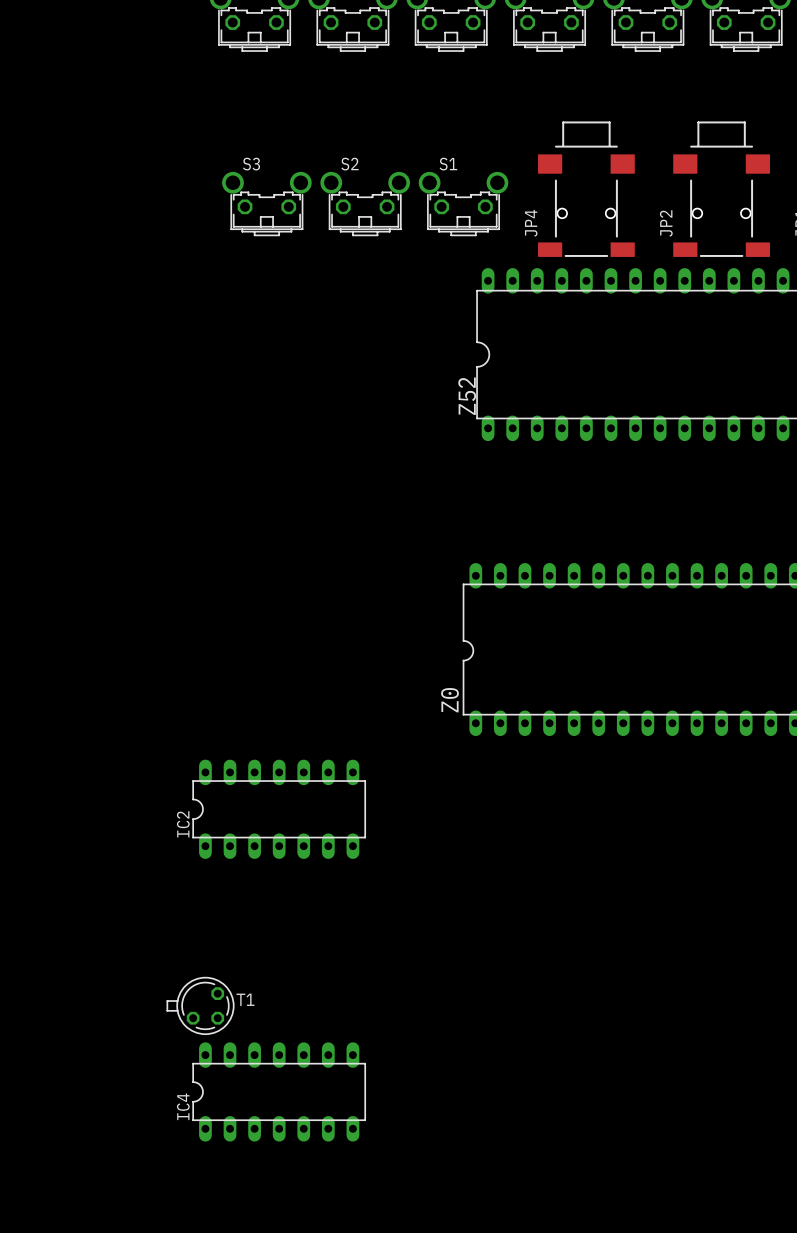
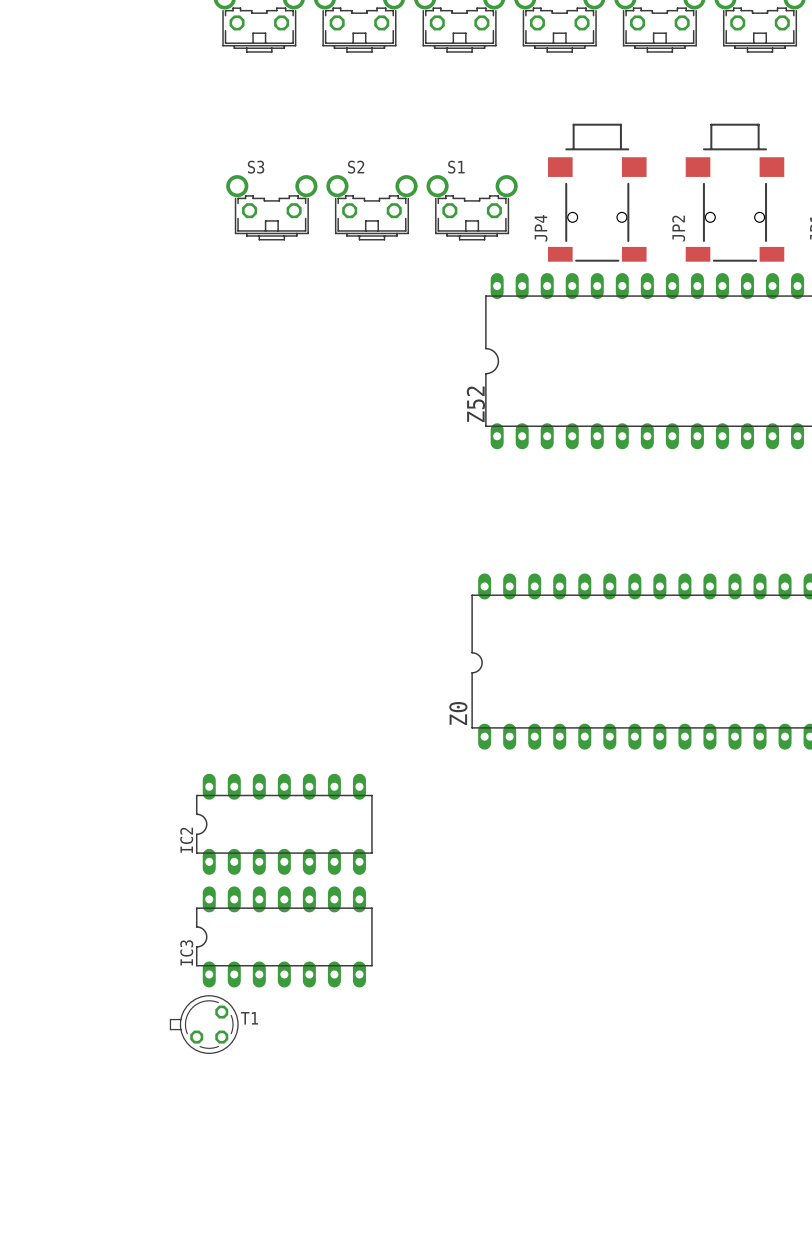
IC3: none -> (284, 936)
IC4: (279, 1091) -> none

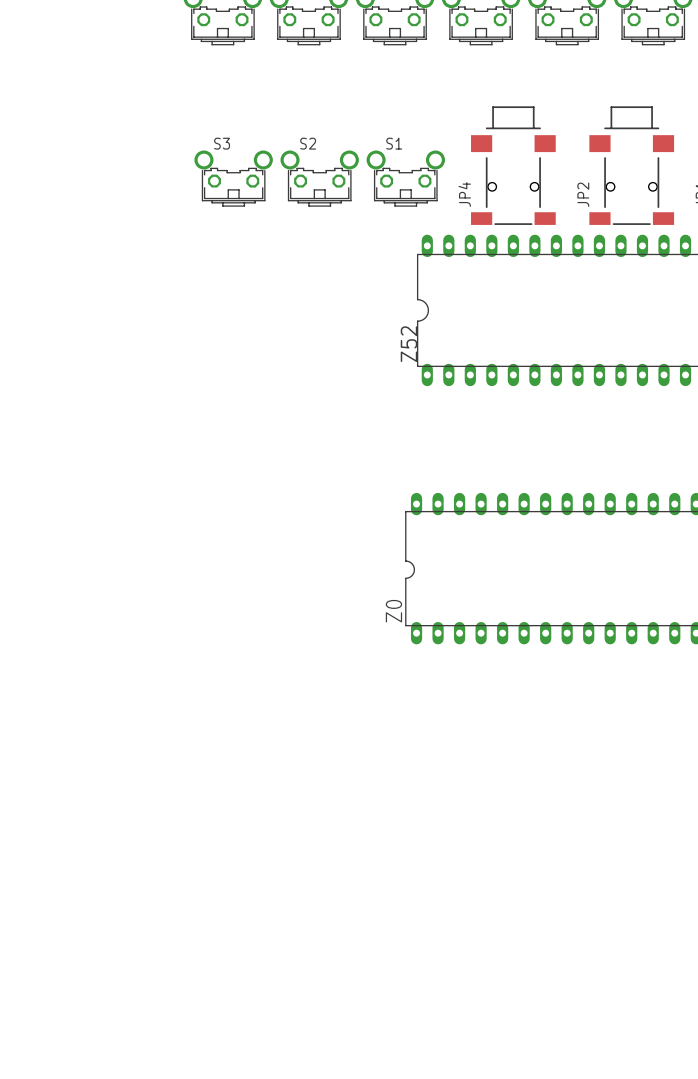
IC2: (284, 824) -> none
IC3: (284, 936) -> none
T1: (204, 1024) -> none

